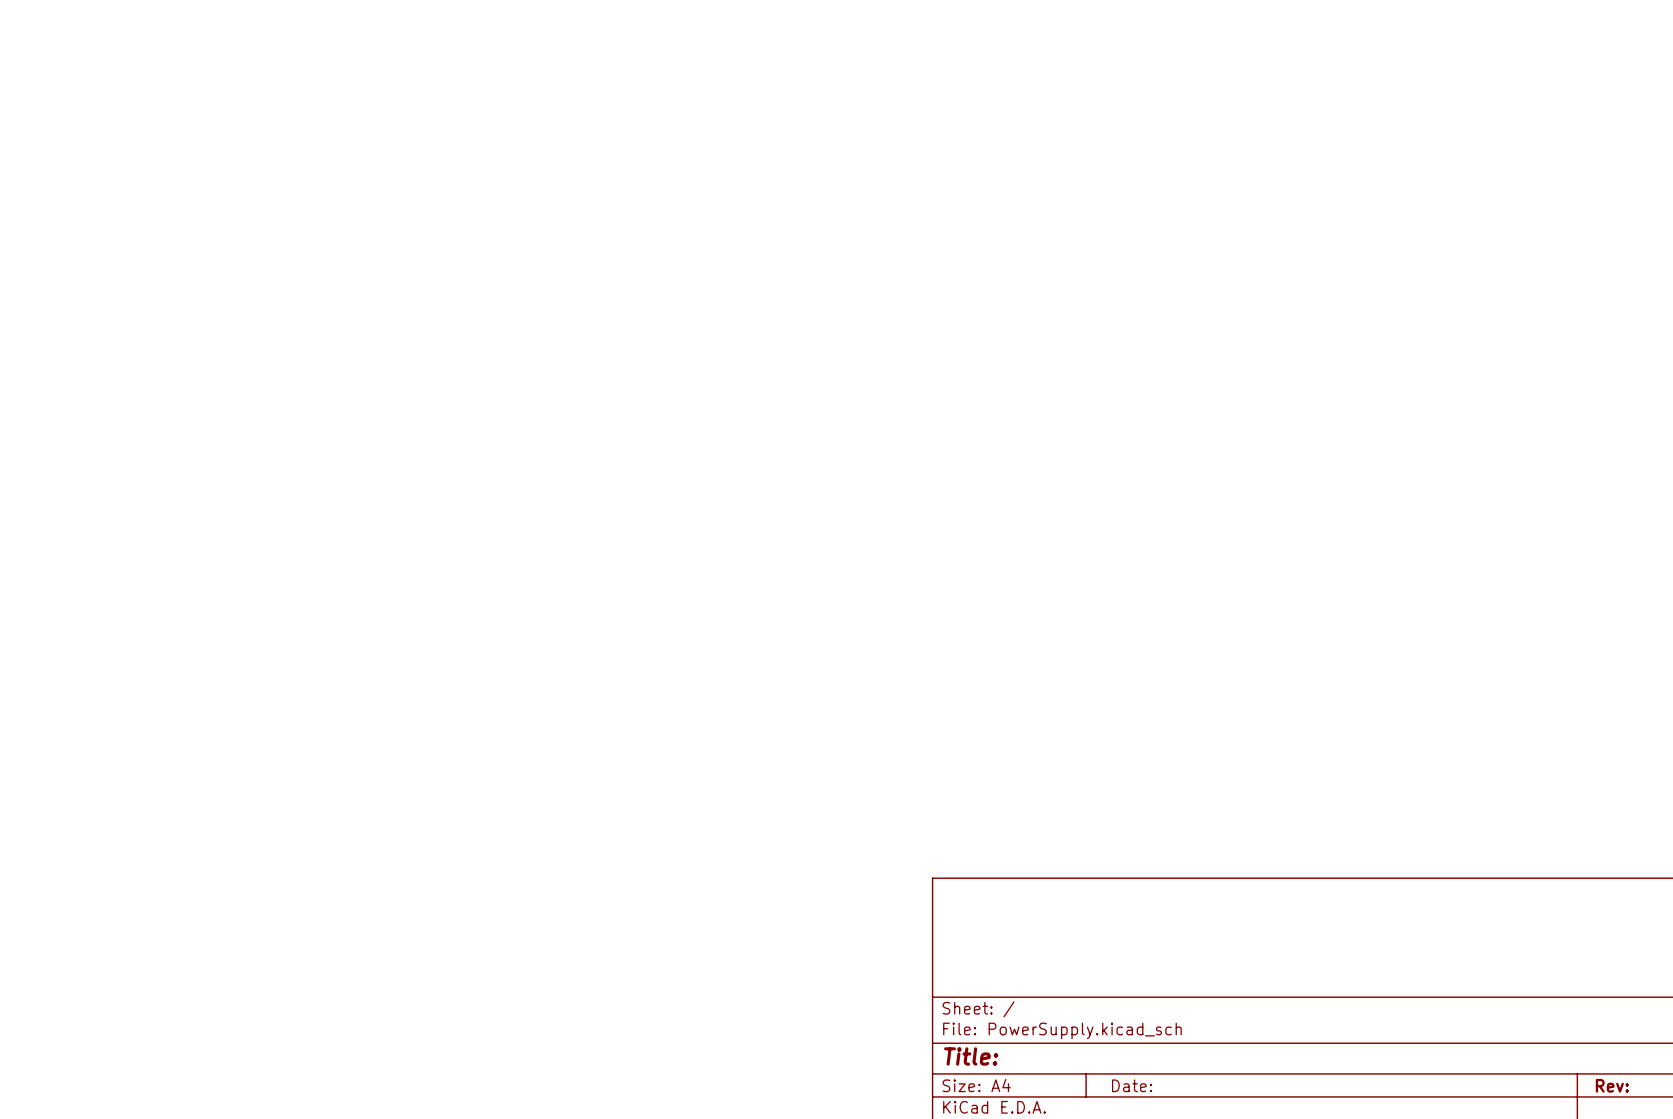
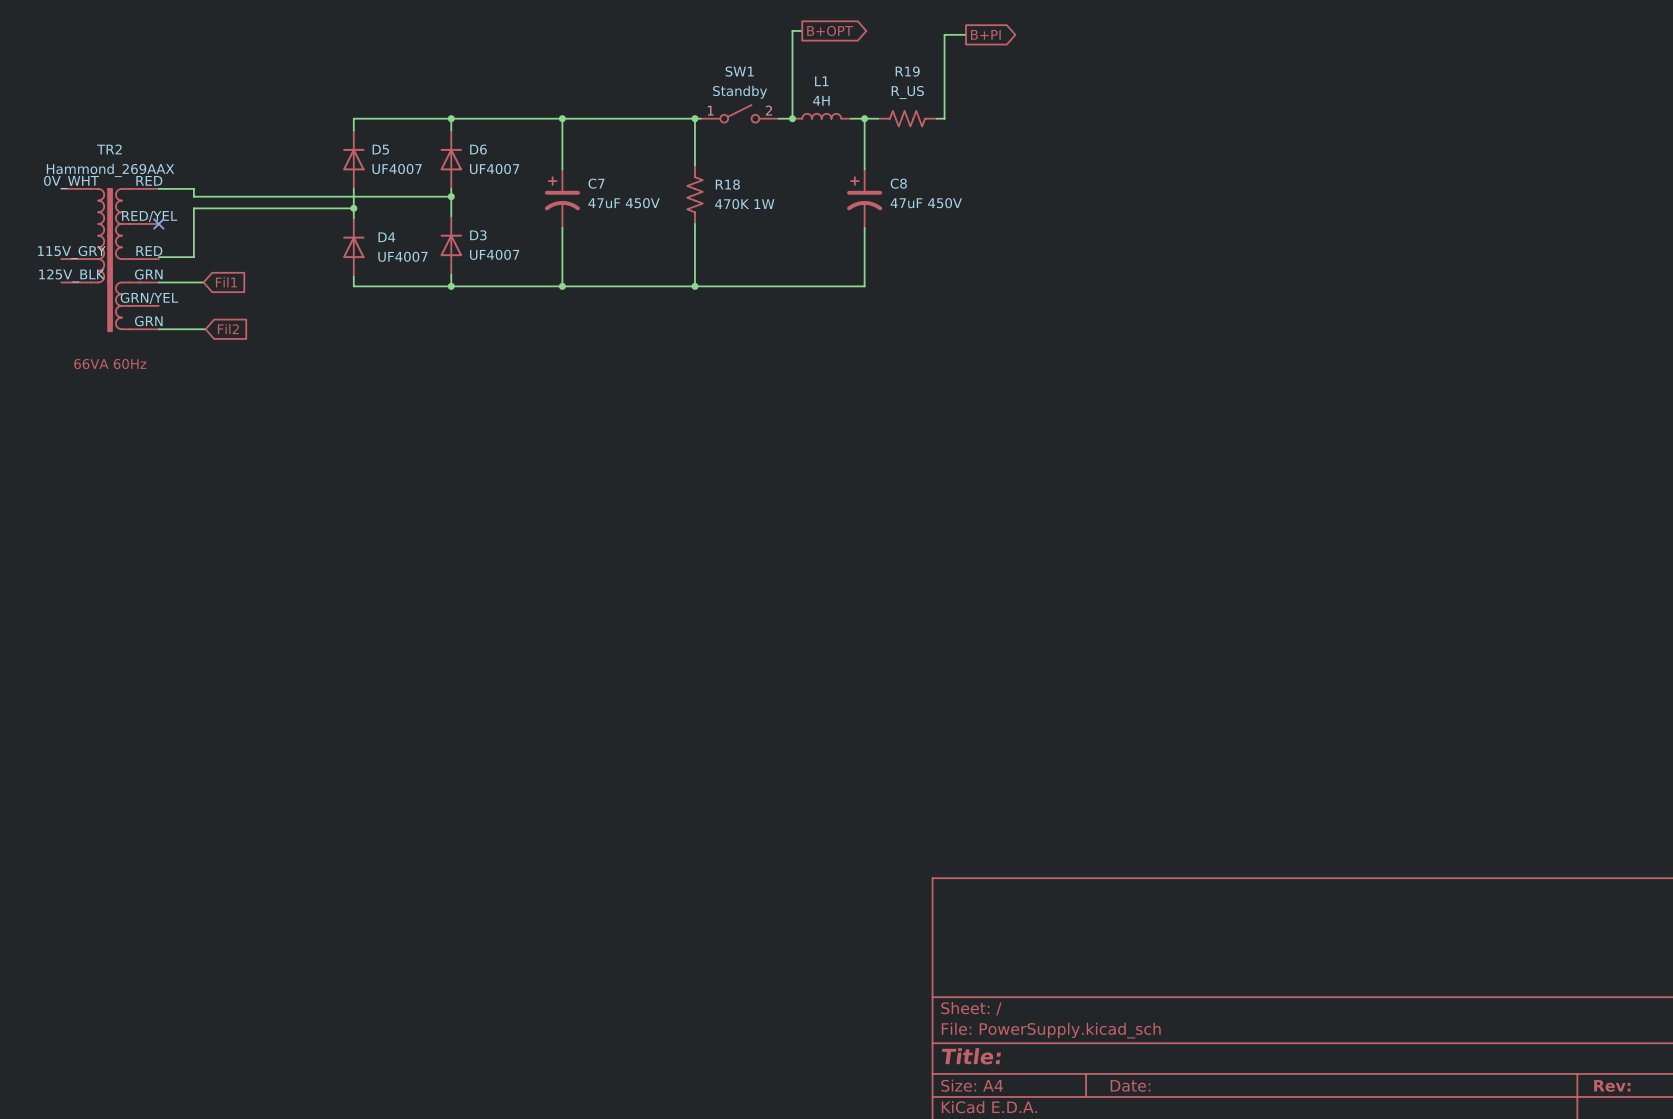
wire: none -> (802, 30) (792, 30) (792, 118) (778, 118)
global label: none -> B+OPT (830, 30)
wire: none -> (966, 34) (944, 34) (944, 118) (936, 118)
global label: none -> B+PI (985, 34)
SW1: none -> Standby (739, 113)
L1: none -> 4H (821, 116)
wire: none -> (451, 118) (451, 130)
junction: none -> (451, 118)
wire: none -> (562, 118) (562, 169)
junction: none -> (562, 118)
wire: none -> (694, 118) (694, 165)
junction: none -> (694, 118)
wire: none -> (700, 118) (353, 118) (353, 130)
junction: none -> (792, 118)
wire: none -> (850, 118) (878, 118)
wire: none -> (864, 118) (864, 169)
junction: none -> (864, 118)
R19: none -> R_US (907, 118)
D5: none -> UF4007 (353, 159)
D6: none -> UF4007 (451, 159)
wire: none -> (158, 188) (193, 188) (193, 196) (451, 196)
wire: none -> (353, 188) (353, 218)
wire: none -> (451, 188) (451, 216)
R18: none -> 470K 1W (694, 194)
junction: none -> (451, 196)
C7: none -> 47uF 450V (562, 198)
C8: none -> 47uF 450V (864, 198)
wire: none -> (353, 208) (193, 208) (193, 257) (158, 257)
junction: none -> (353, 208)
no-connect mark: none -> (158, 223)
wire: none -> (694, 223) (694, 286)
wire: none -> (562, 227) (562, 286)
wire: none -> (864, 227) (864, 286) (353, 286) (353, 276)
D3: none -> UF4007 (451, 245)
D4: none -> UF4007 (353, 247)
TR2: none -> Hammond_269AAX (110, 259)
wire: none -> (451, 274) (451, 286)
wire: none -> (158, 282) (203, 282)
global label: none -> Fil1 (226, 282)
junction: none -> (451, 286)
junction: none -> (562, 286)
junction: none -> (694, 286)
wire: none -> (158, 329) (205, 329)
global label: none -> Fil2 (228, 329)

